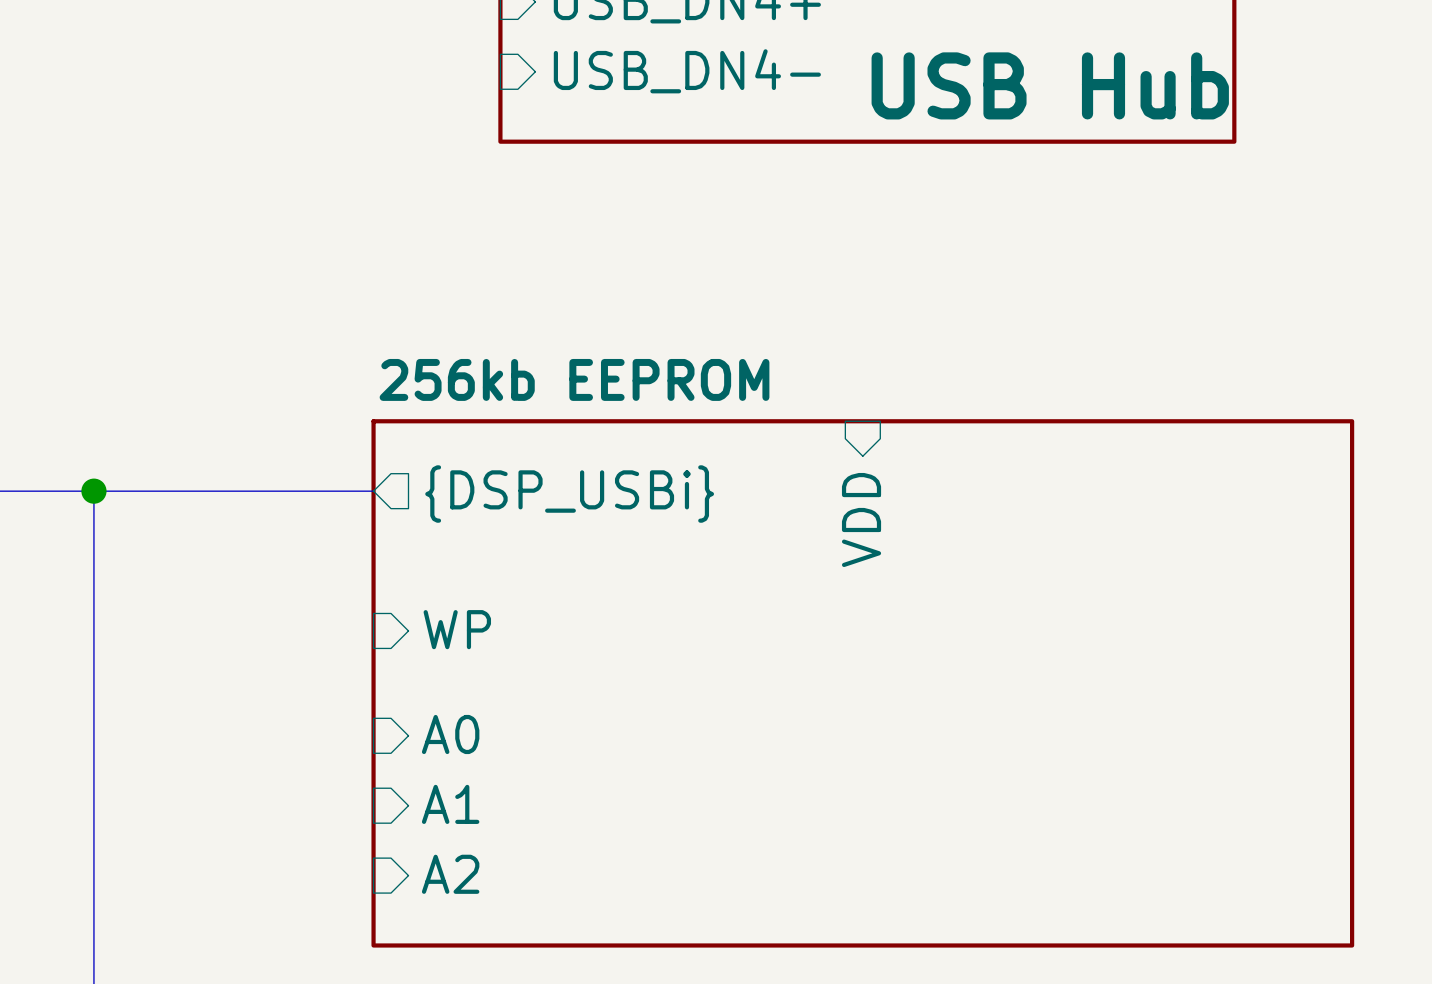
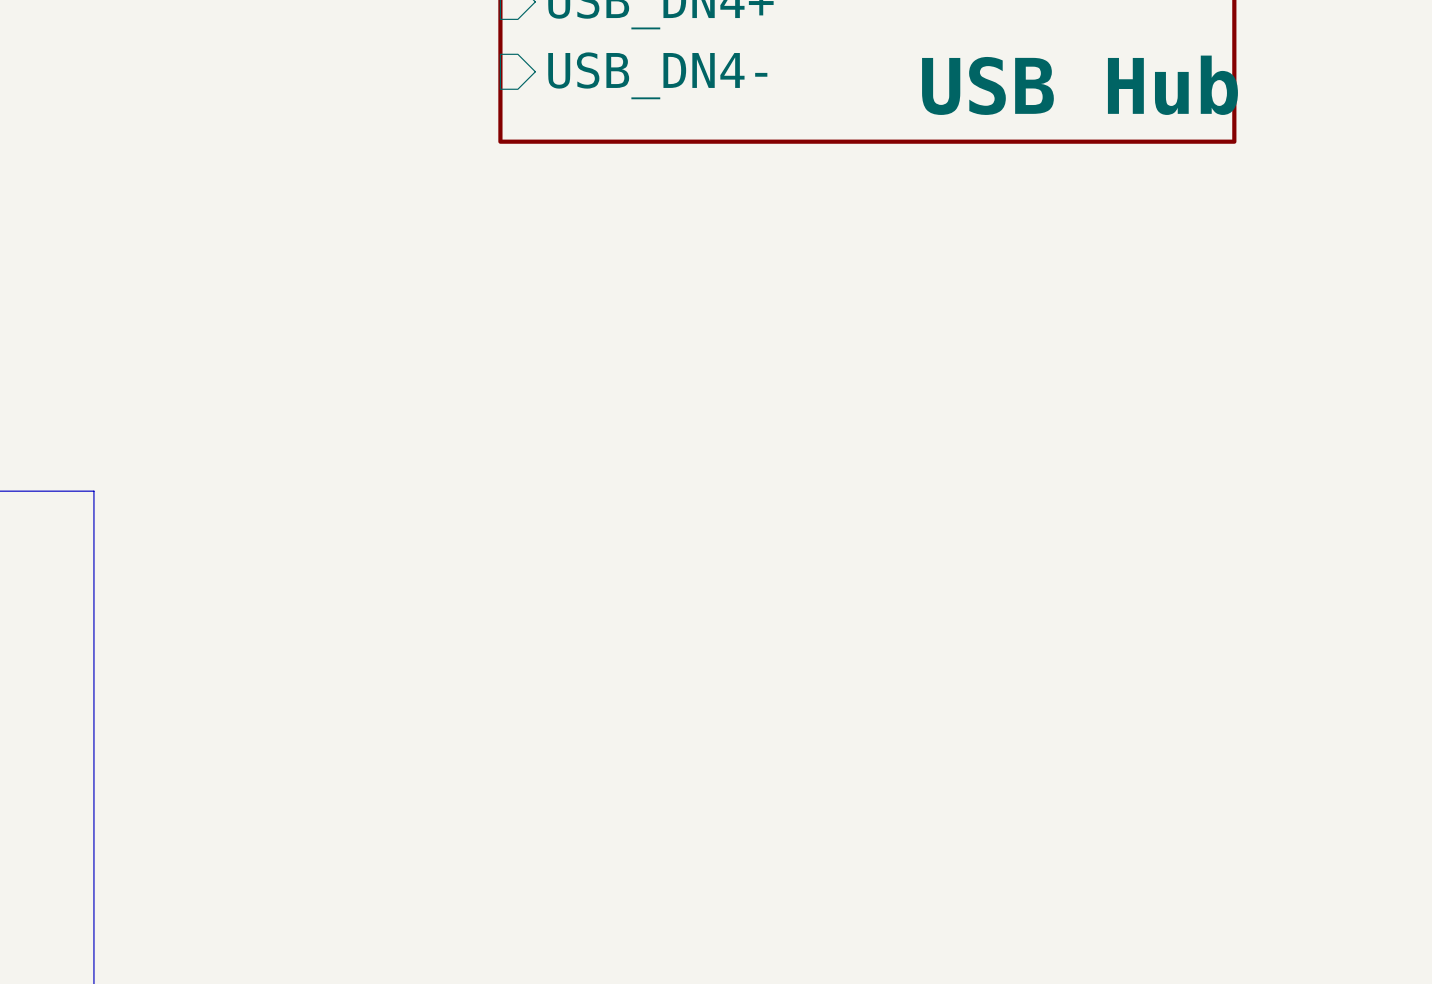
bus: (93, 491) (373, 491) -> none
junction: (93, 491) -> none
sheet pin: {DSP_USBi} (569, 494) -> none
sheet pin: VDD (861, 520) -> none
sheet pin: WP (457, 629) -> none
sheet 256kb EEPROM: (862, 683) -> none
sheet pin: A0 (450, 734) -> none
sheet pin: A1 (450, 804) -> none
sheet pin: A2 (450, 874) -> none

